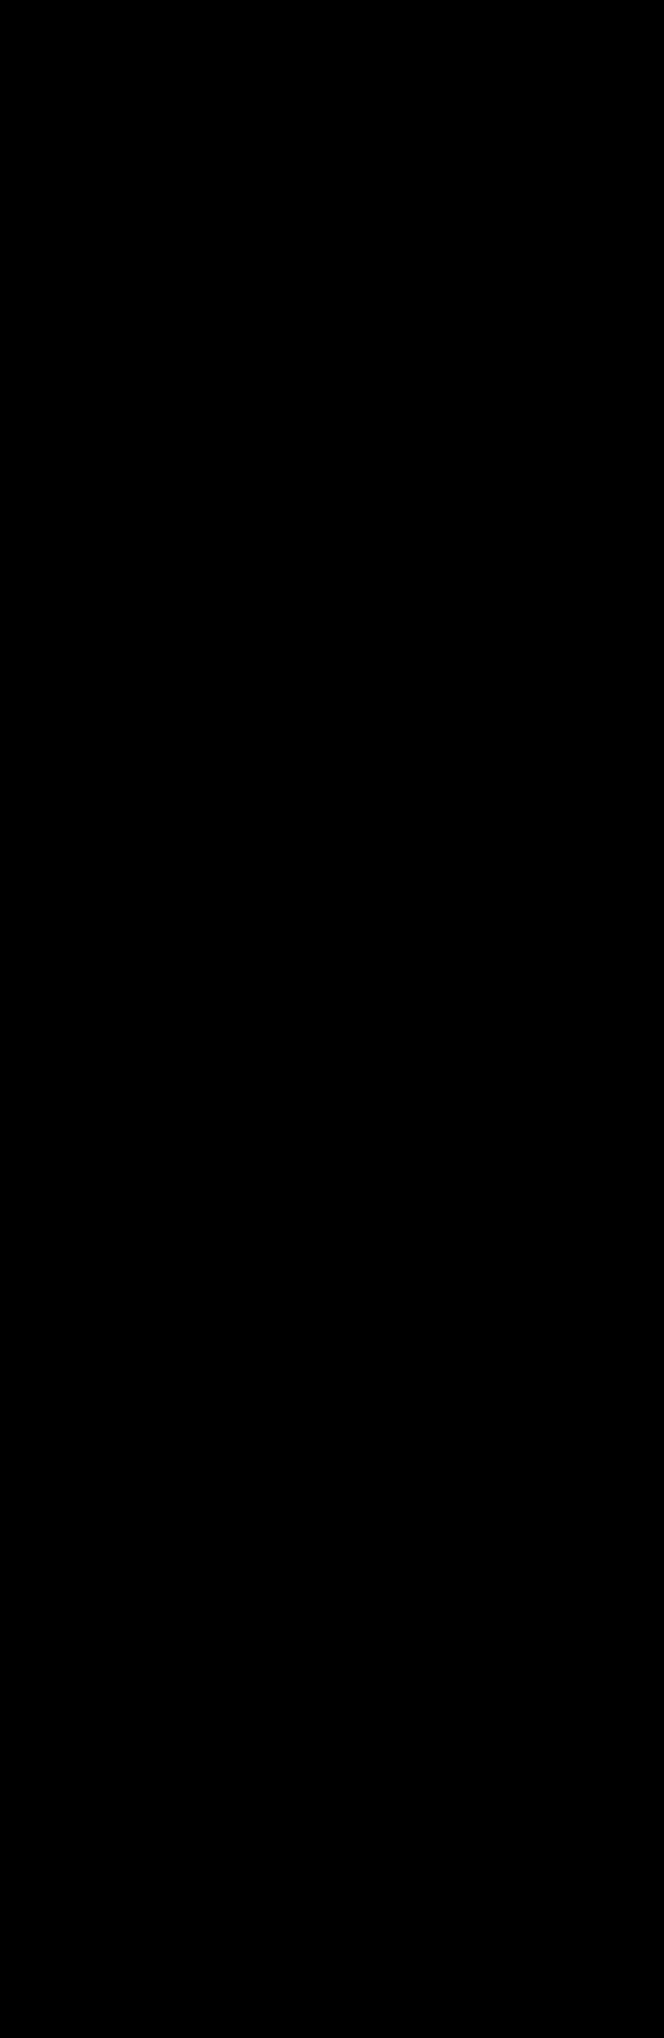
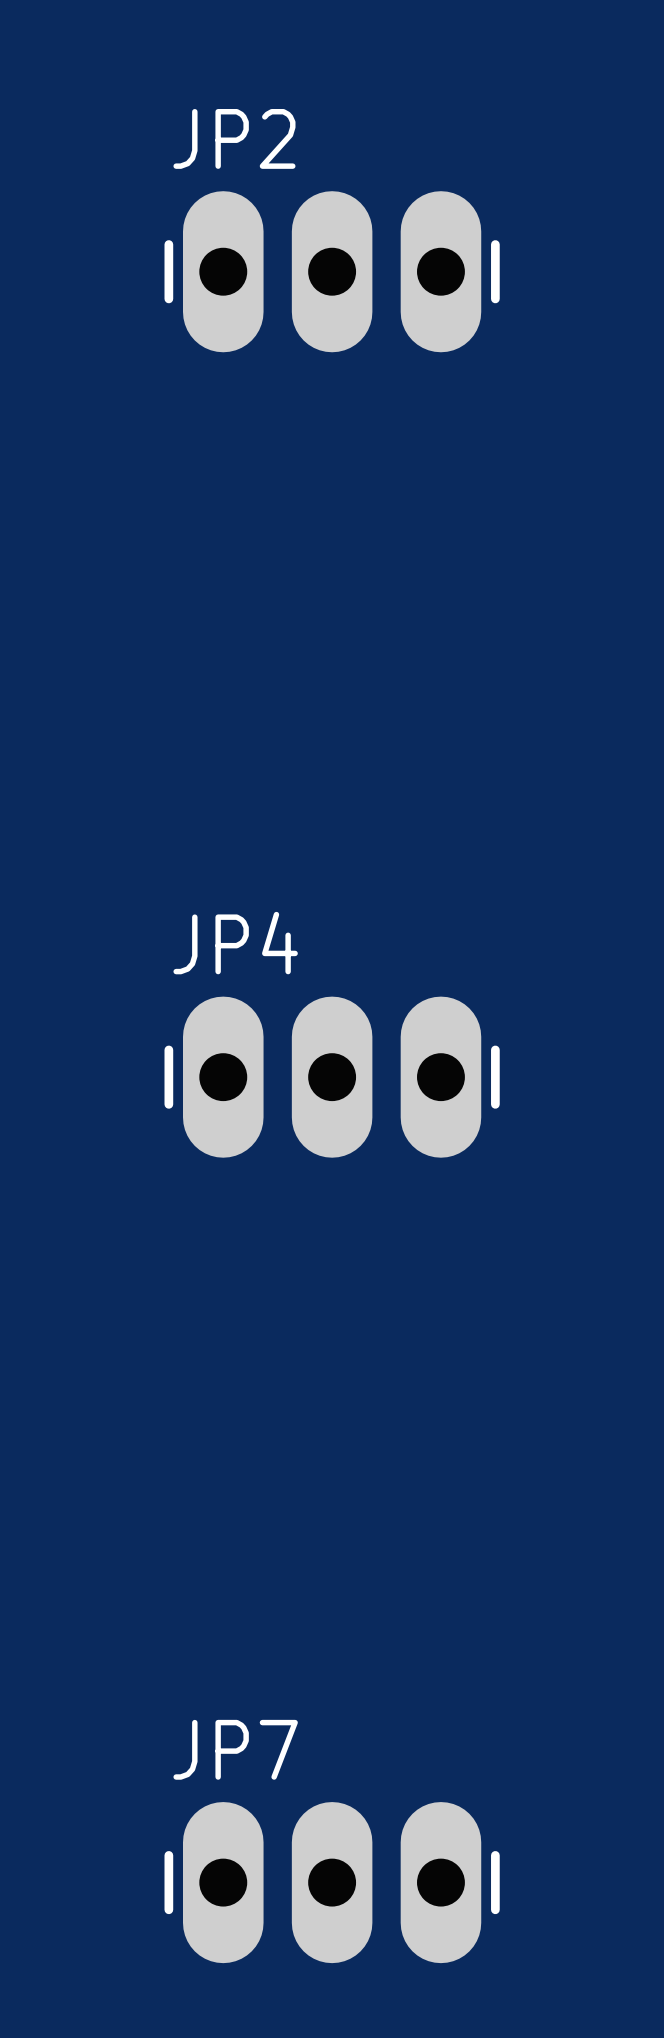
JP2: none -> (332, 271)
JP4: none -> (332, 1077)
JP7: none -> (332, 1882)

